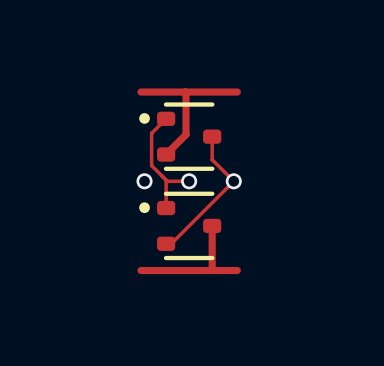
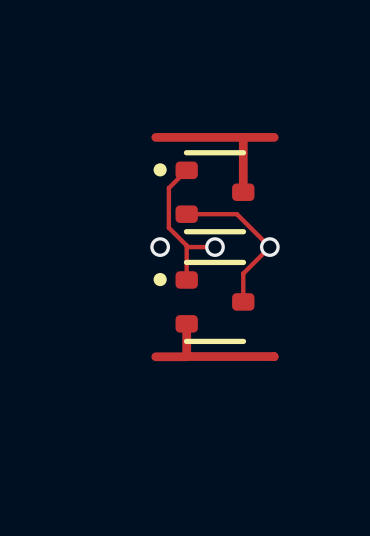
top track: (185, 92) (185, 134) (166, 154) -> none
top track: (212, 136) (212, 159) -> (186, 214) (236, 214) (243, 220)
top track: (212, 202) (171, 243) (166, 243) -> (243, 273) (243, 301)
top track: (212, 225) (212, 270) -> (243, 137) (243, 192)
top track: none -> (186, 323) (186, 356)

